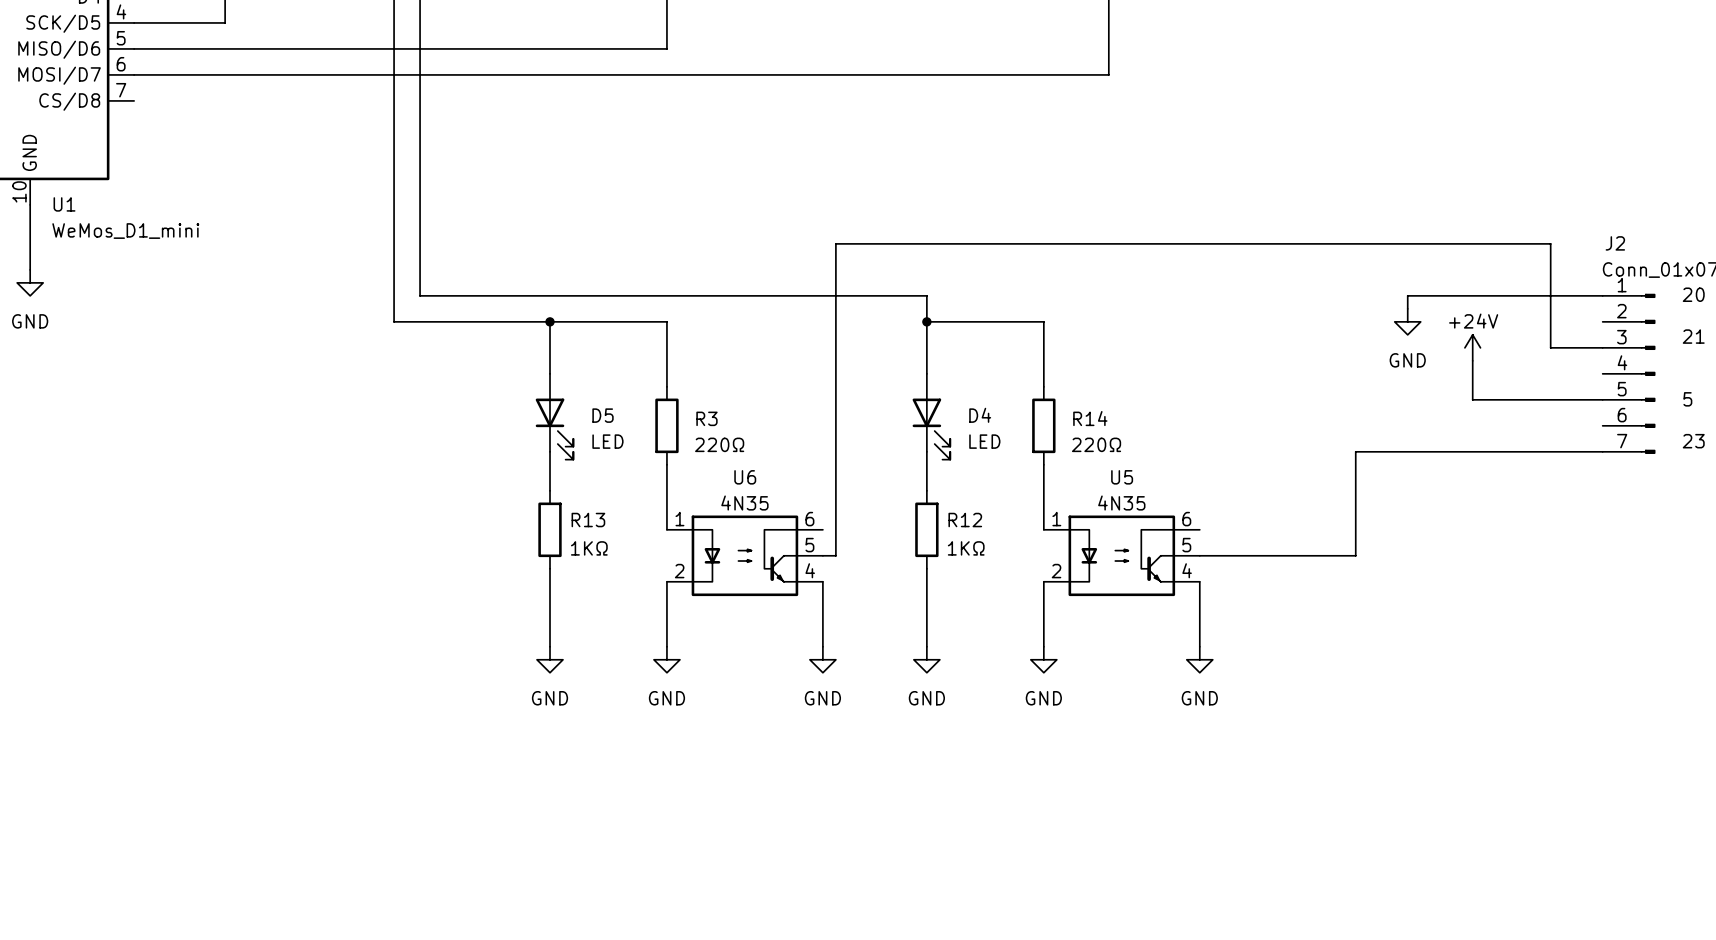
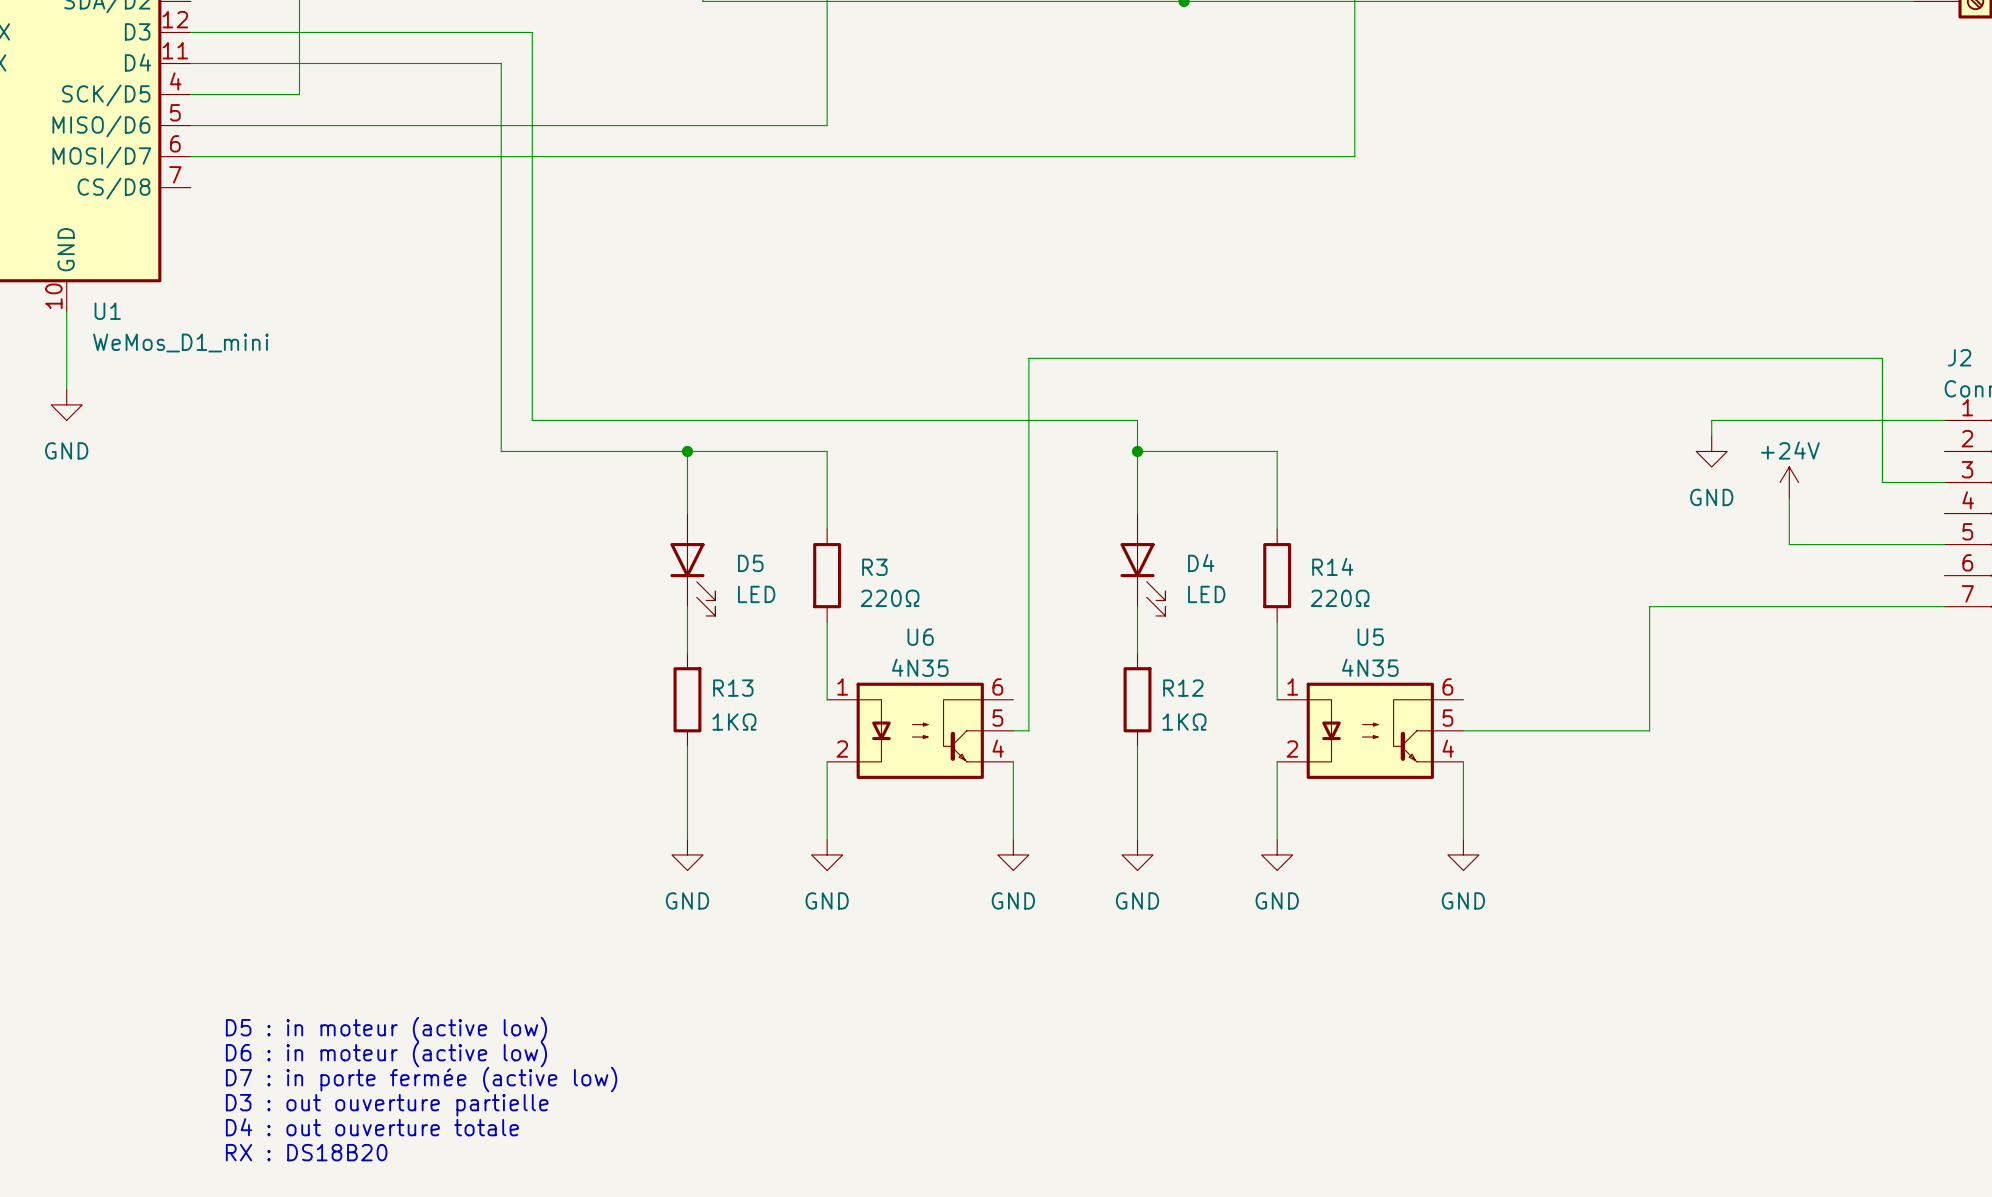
text: none -> D5 : in moteur (active low) (386, 1029)
text: none -> D6 : in moteur (active low) (386, 1054)
text: none -> D7 : in porte fermée (active low) (421, 1079)
text: none -> D3 : out ouverture partielle (387, 1105)
text: none -> D4 : out ouverture totale (372, 1127)
text: none -> RX : DS18B20 (306, 1152)

